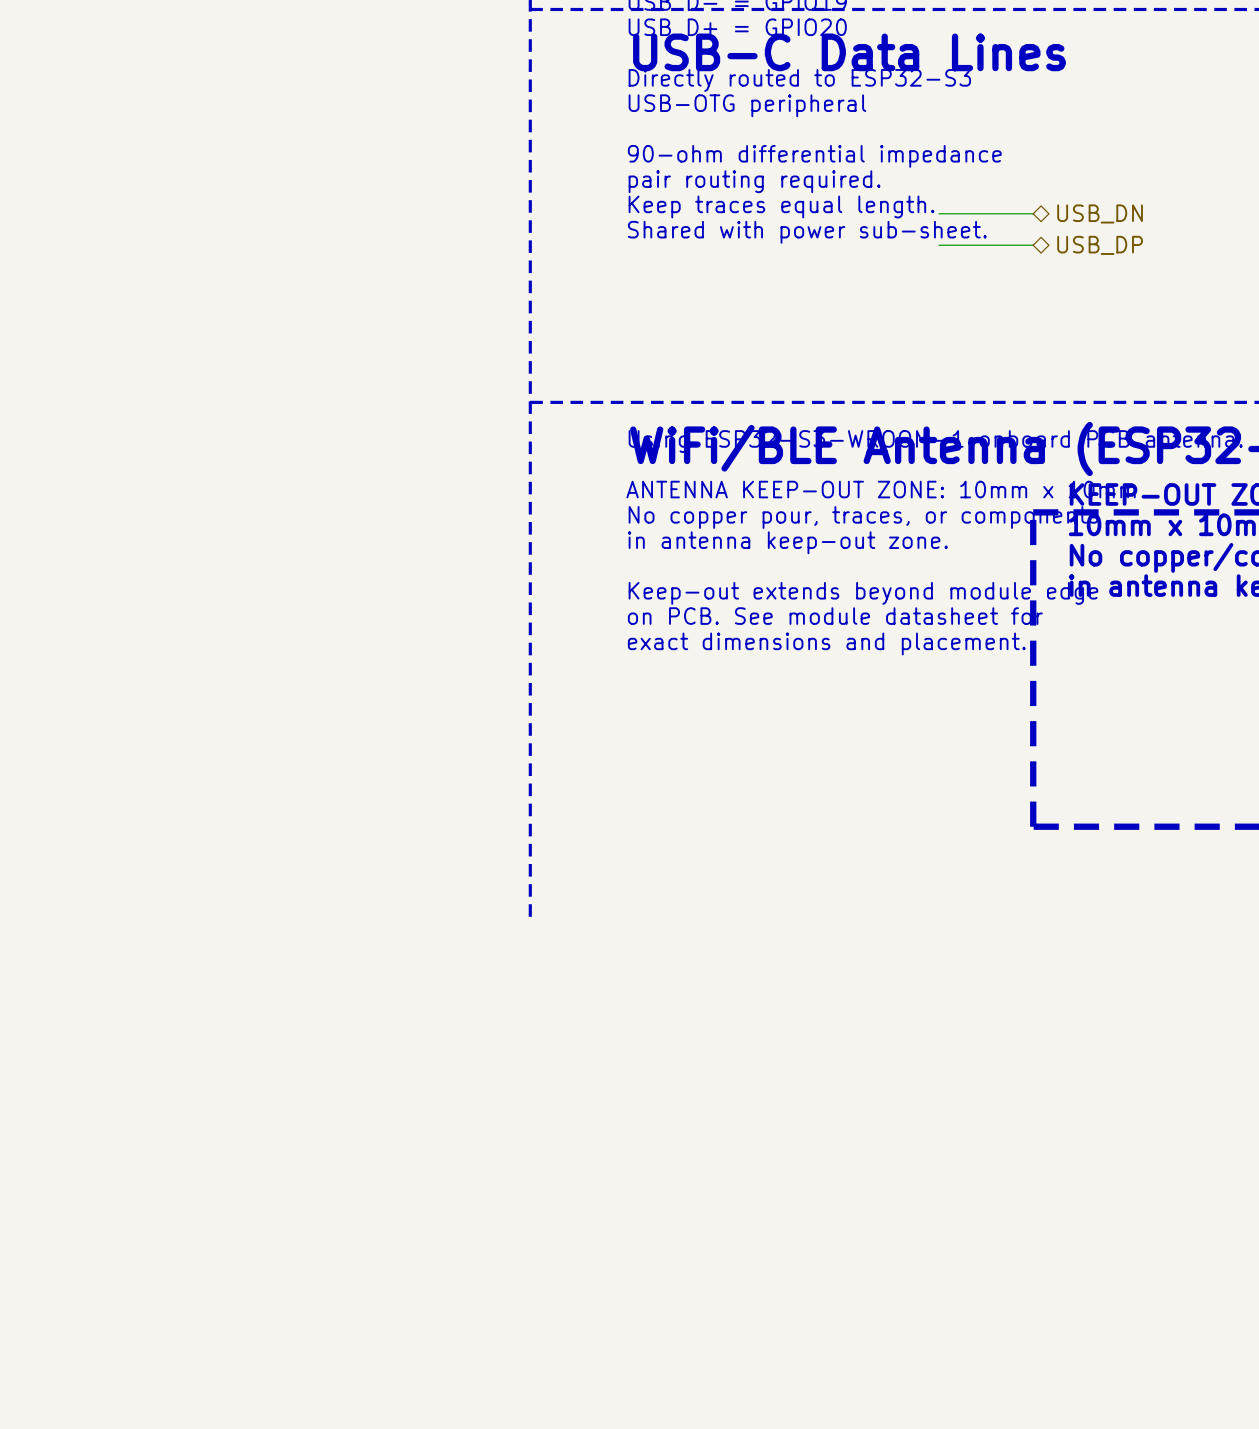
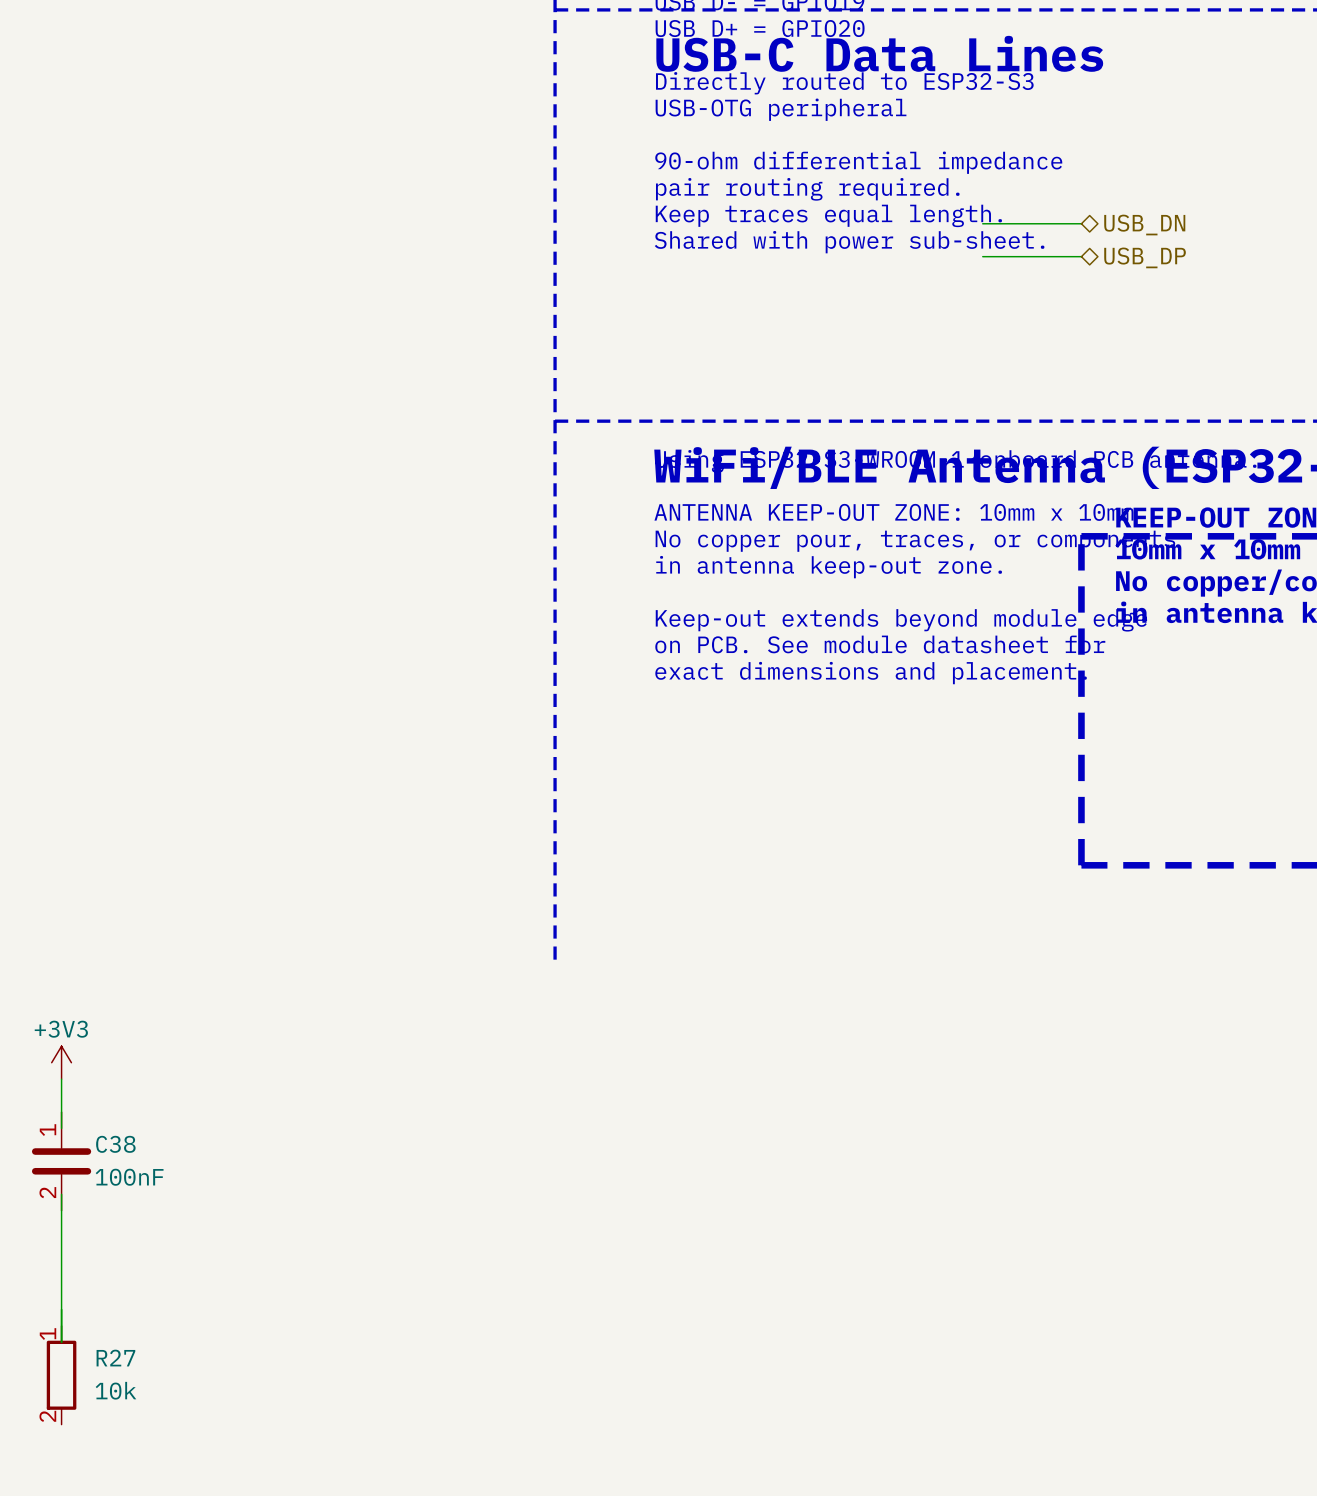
power symbol: none -> +3V3 (61, 1062)
wire: none -> (61, 1079) (61, 1128)
C38: none -> 100nF (61, 1161)
wire: none -> (61, 1194) (61, 1342)
R27: none -> 10k (61, 1375)

